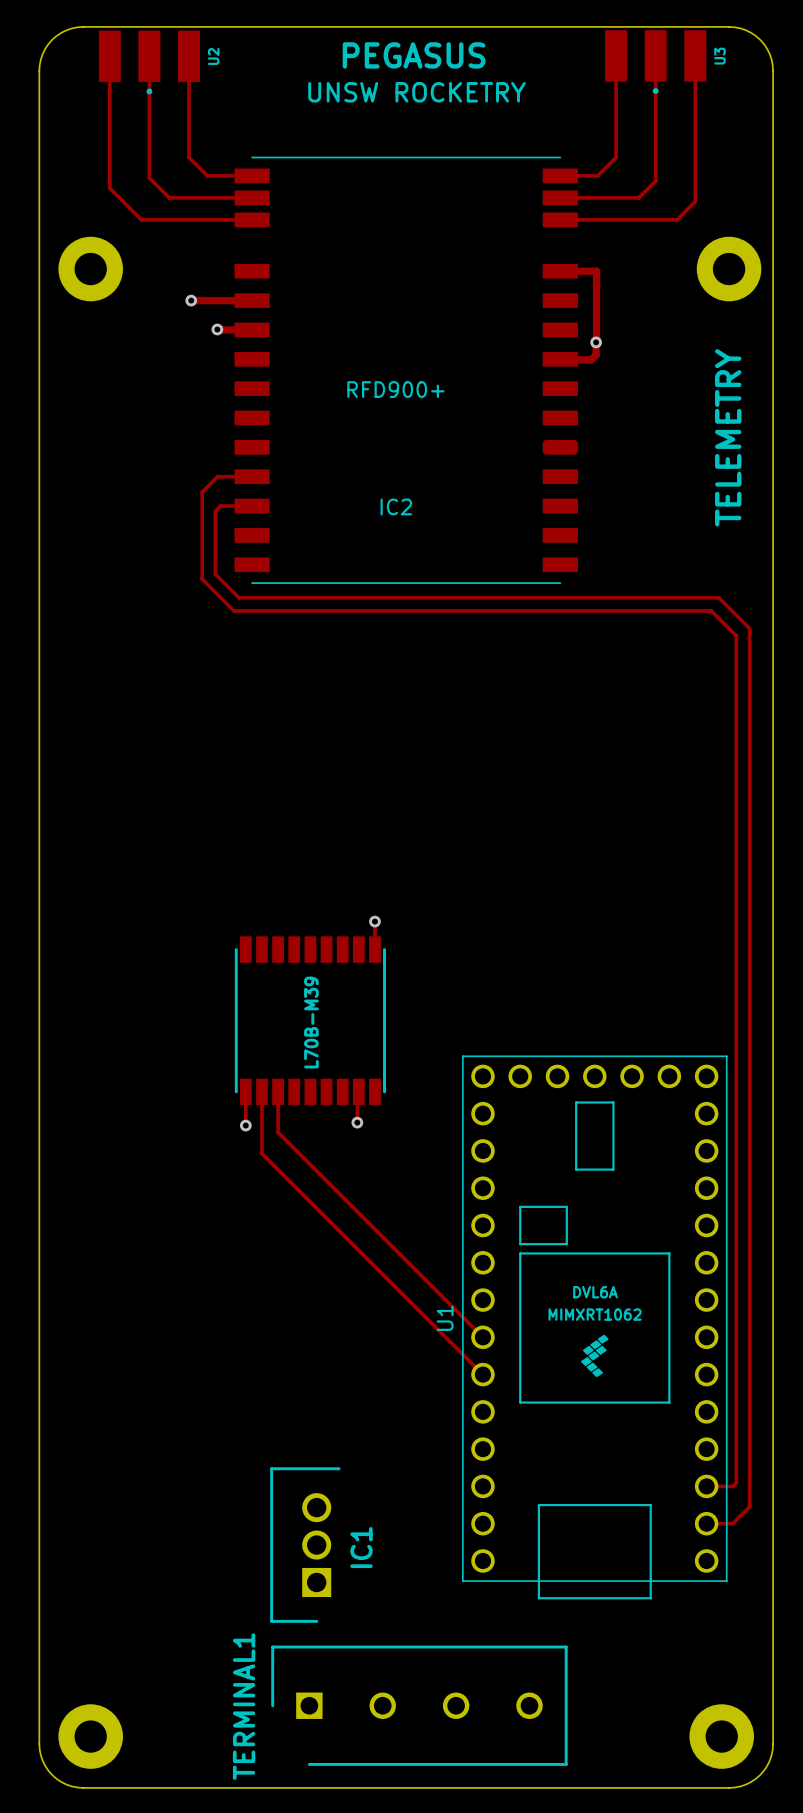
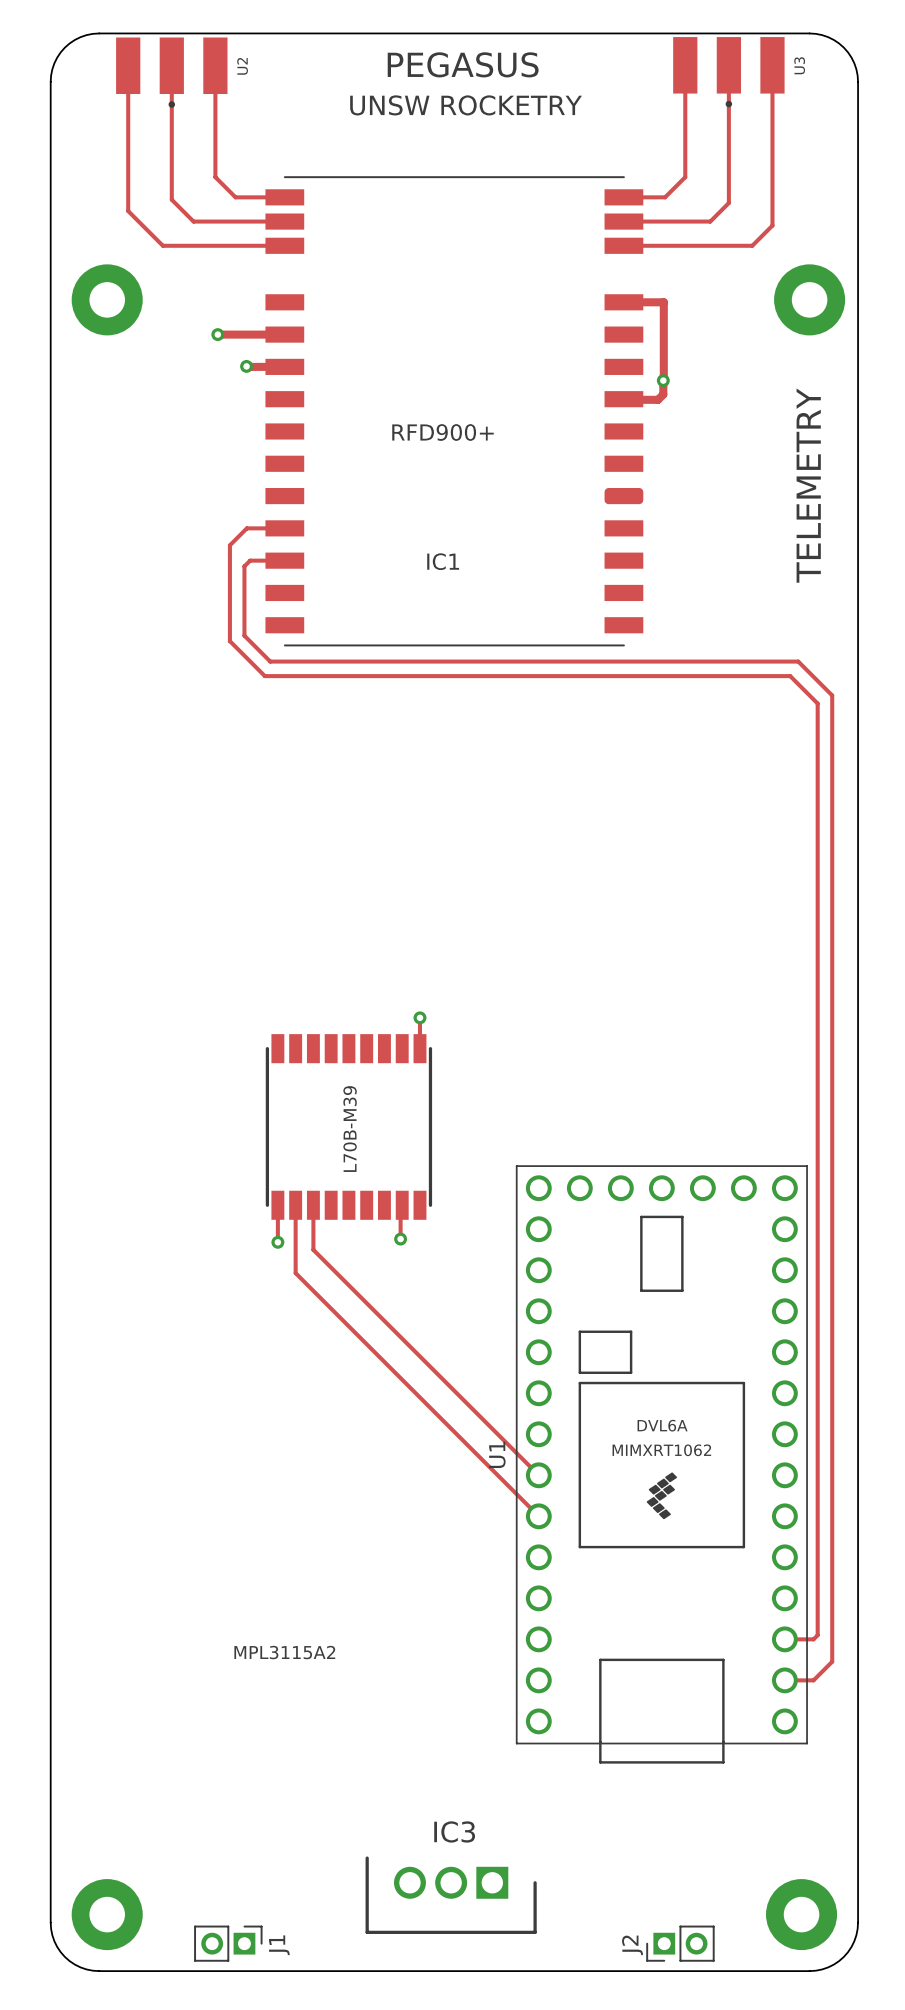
IC2 name: IC2 (396, 506) -> IC1 (443, 561)
text: none -> MPL3115A2 (284, 1652)
IC1: (305, 1545) -> none
TERMINAL1: (419, 1705) -> none
IC3: none -> (451, 1895)
J1: none -> (228, 1943)
J2: none -> (680, 1943)

